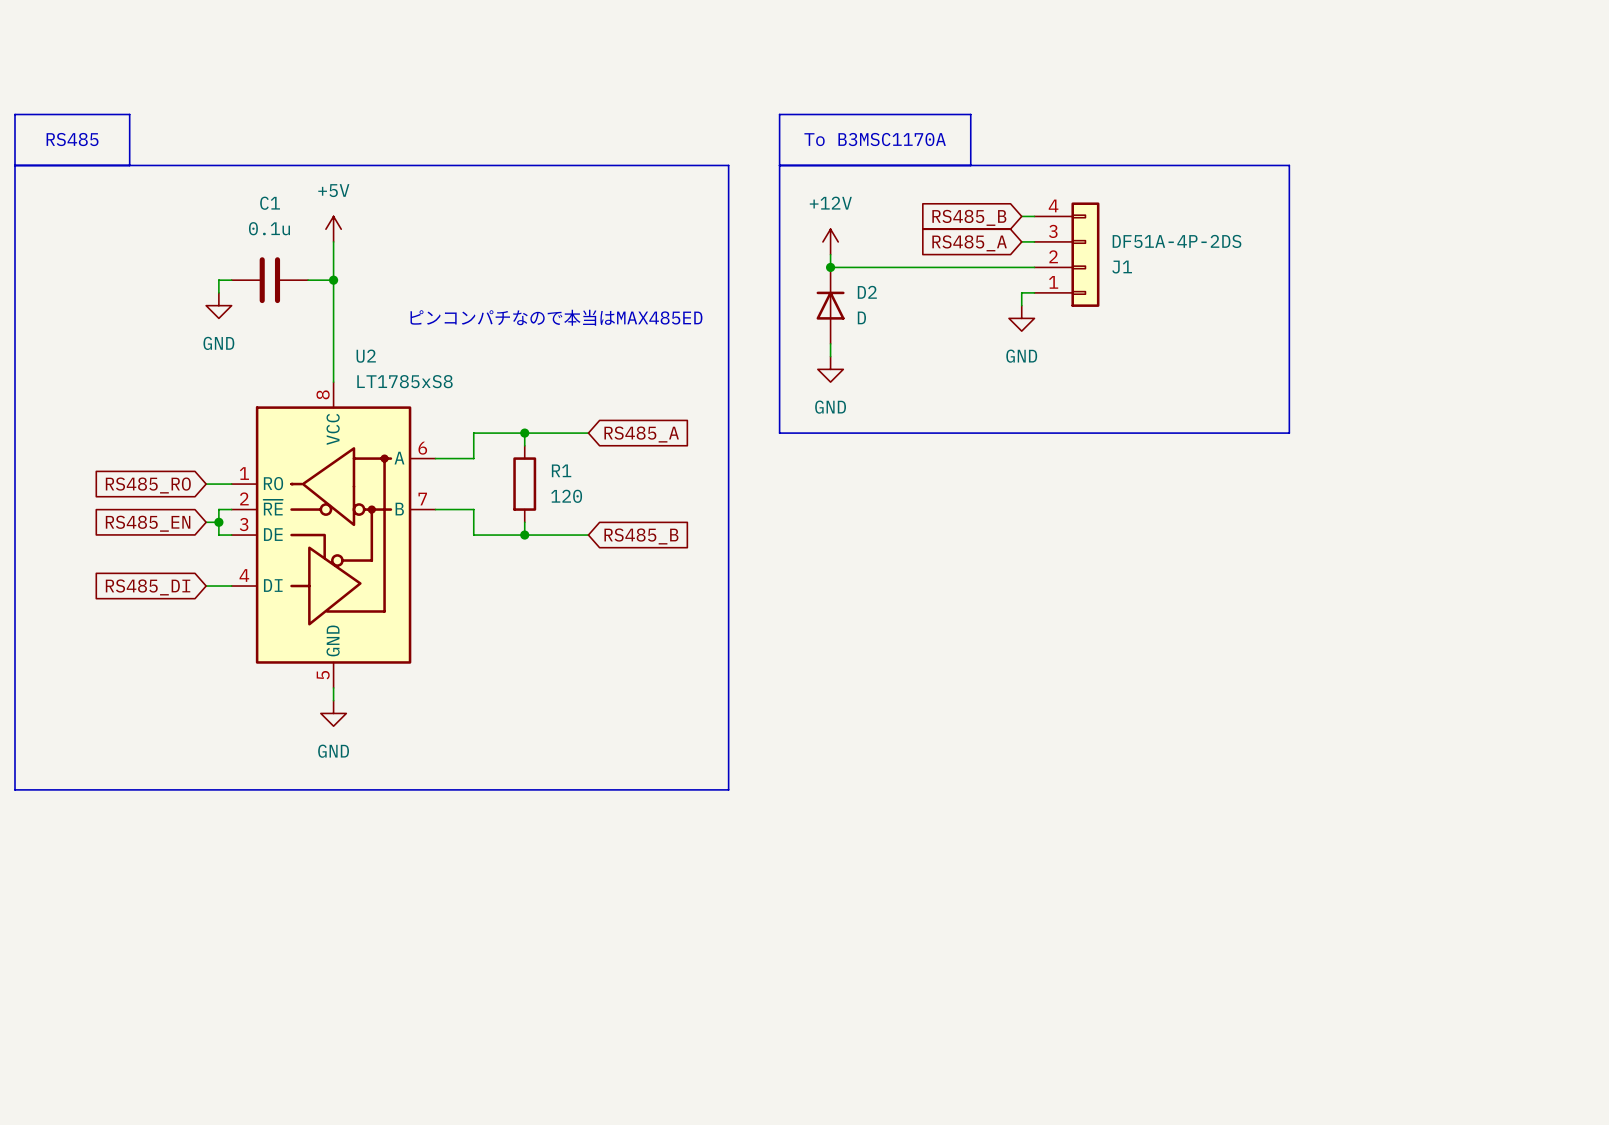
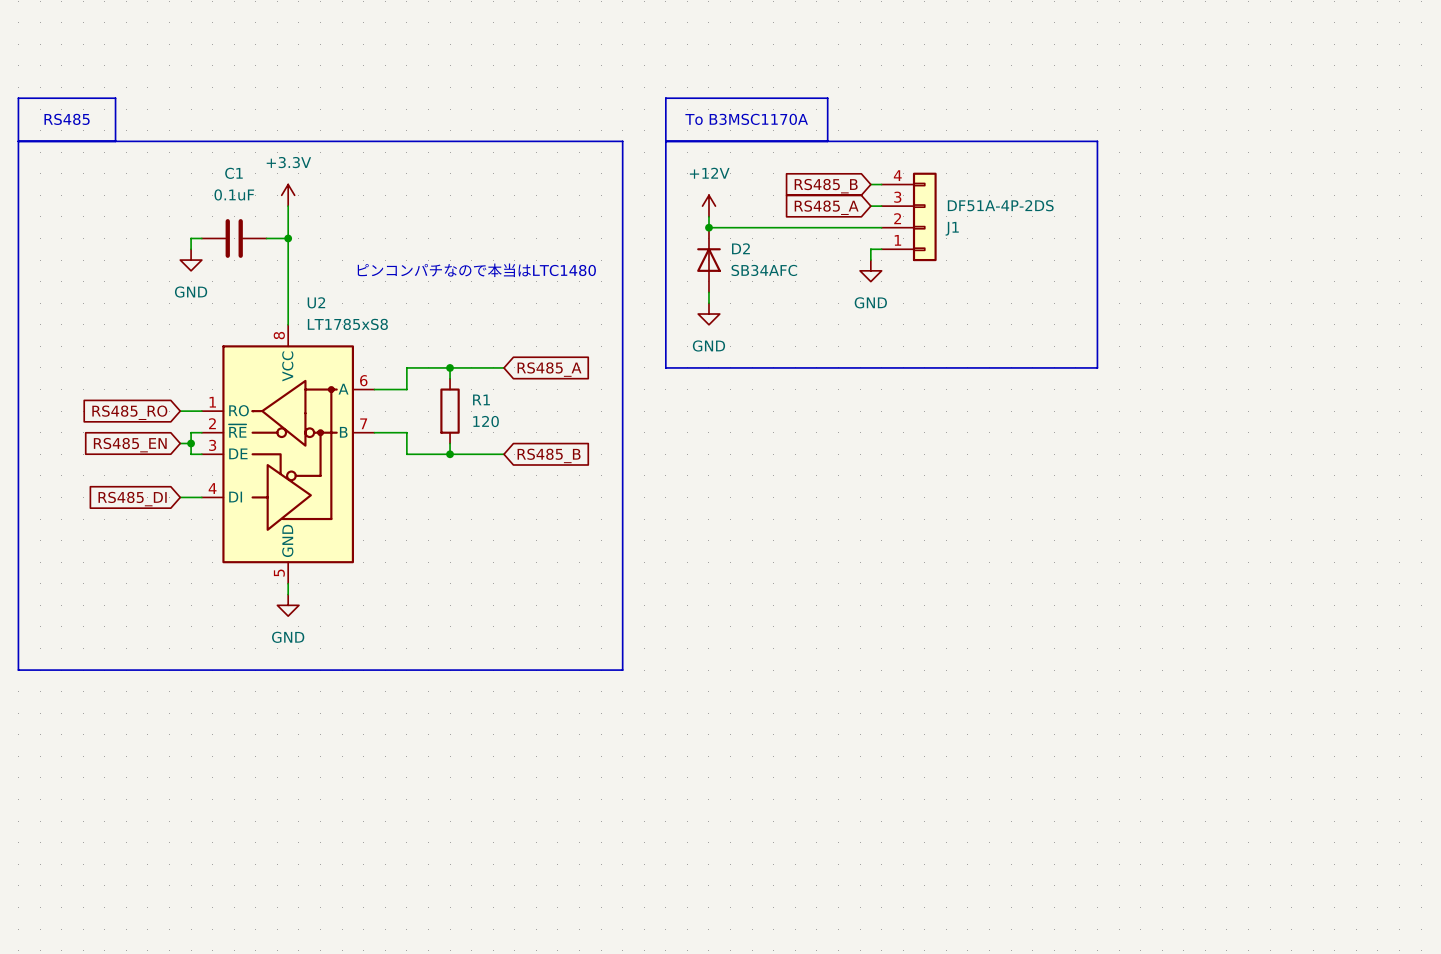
C1 value: 0.1u (269, 228) -> 0.1uF (234, 194)
power symbol: +5V (333, 229) -> +3.3V (288, 195)
text: ピンコンパチなので本当はMAX485ED (556, 317) -> ピンコンパチなので本当はLTC1480 (476, 270)
D2 value: D (861, 317) -> SB34AFC (764, 270)

